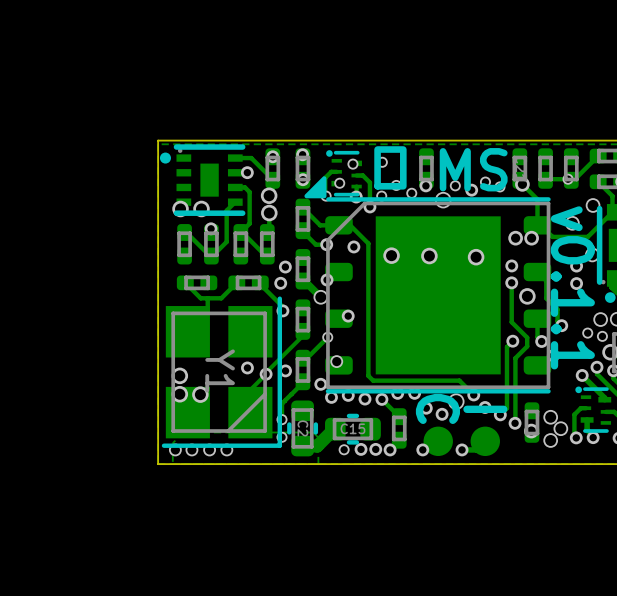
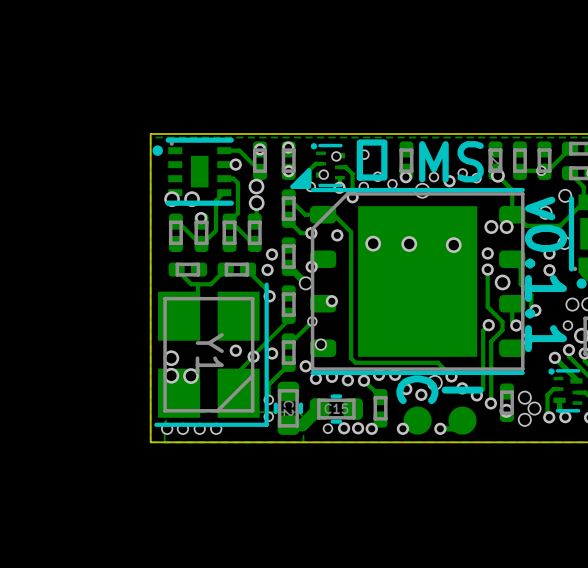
via: (587, 333) -> none
via: (602, 336) -> none
via: none -> (567, 325)

